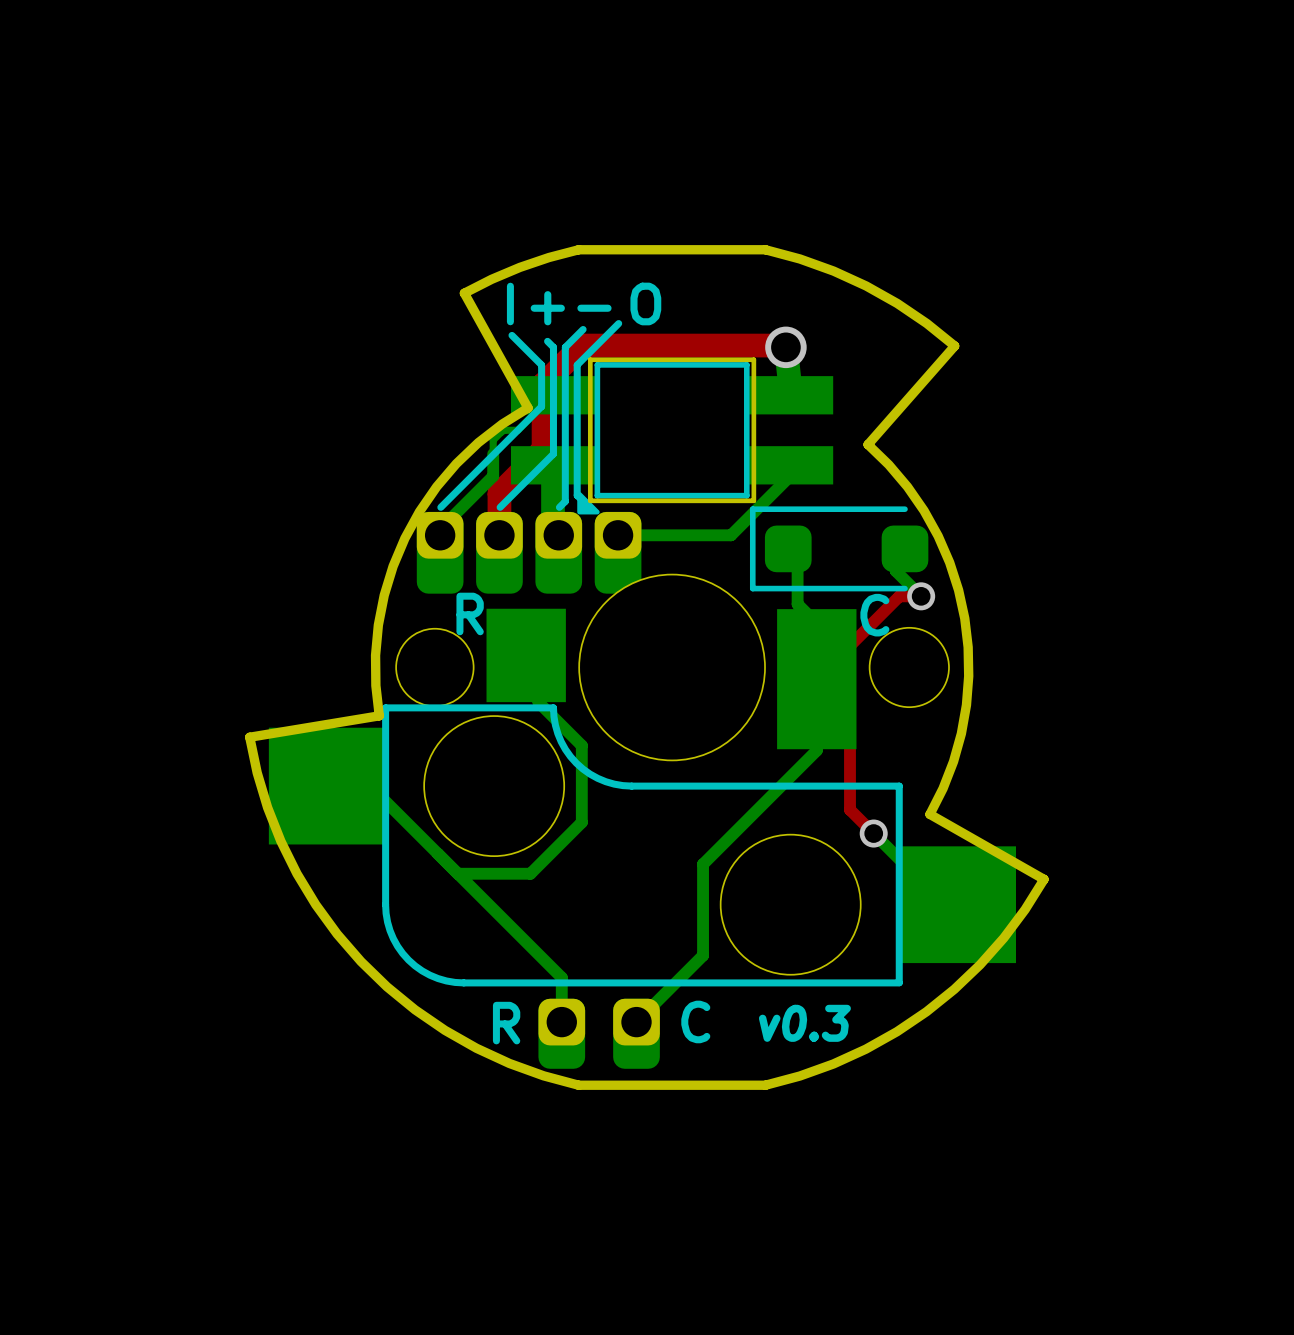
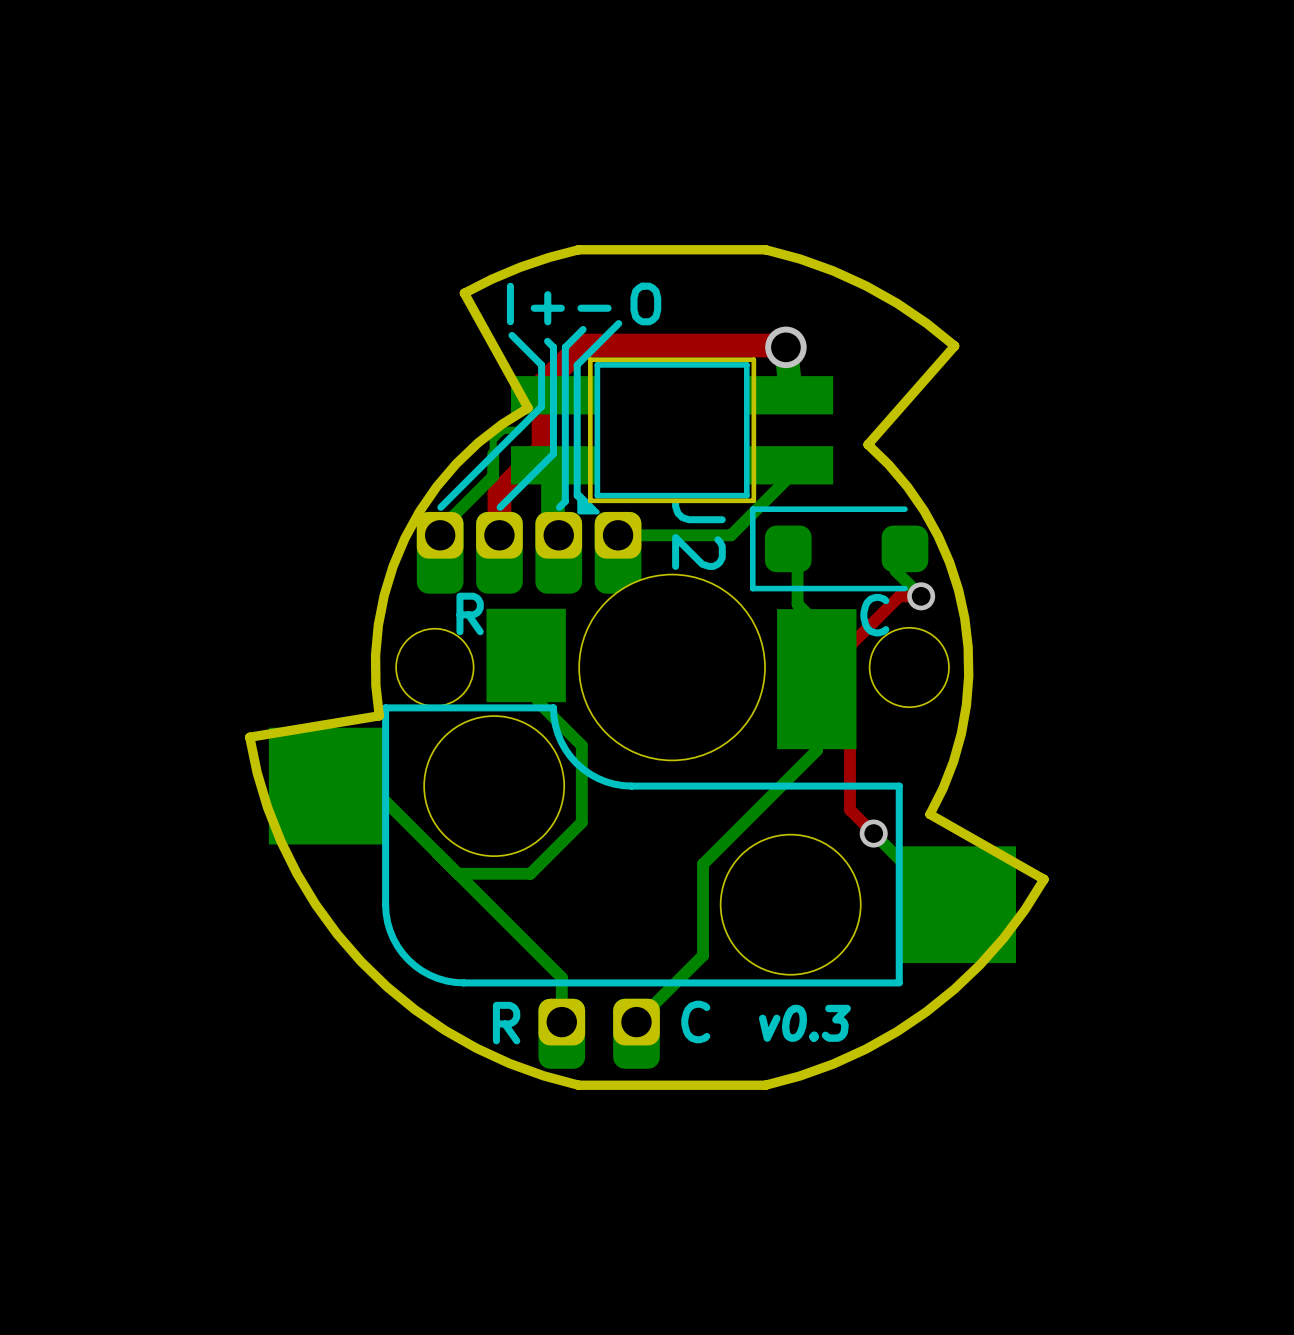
J2 name: none -> J2 (698, 534)

